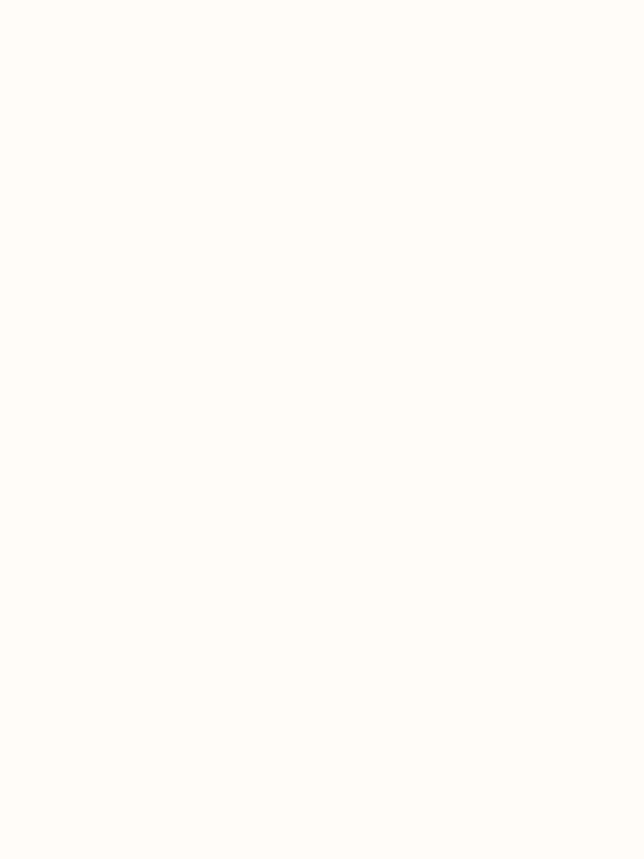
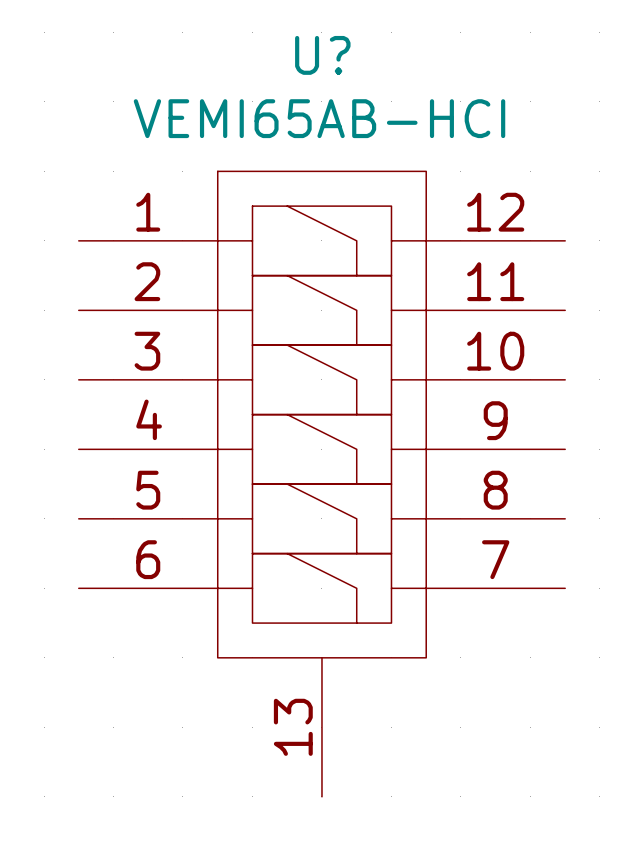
U?: none -> VEMI65AB-HCI (321, 484)

